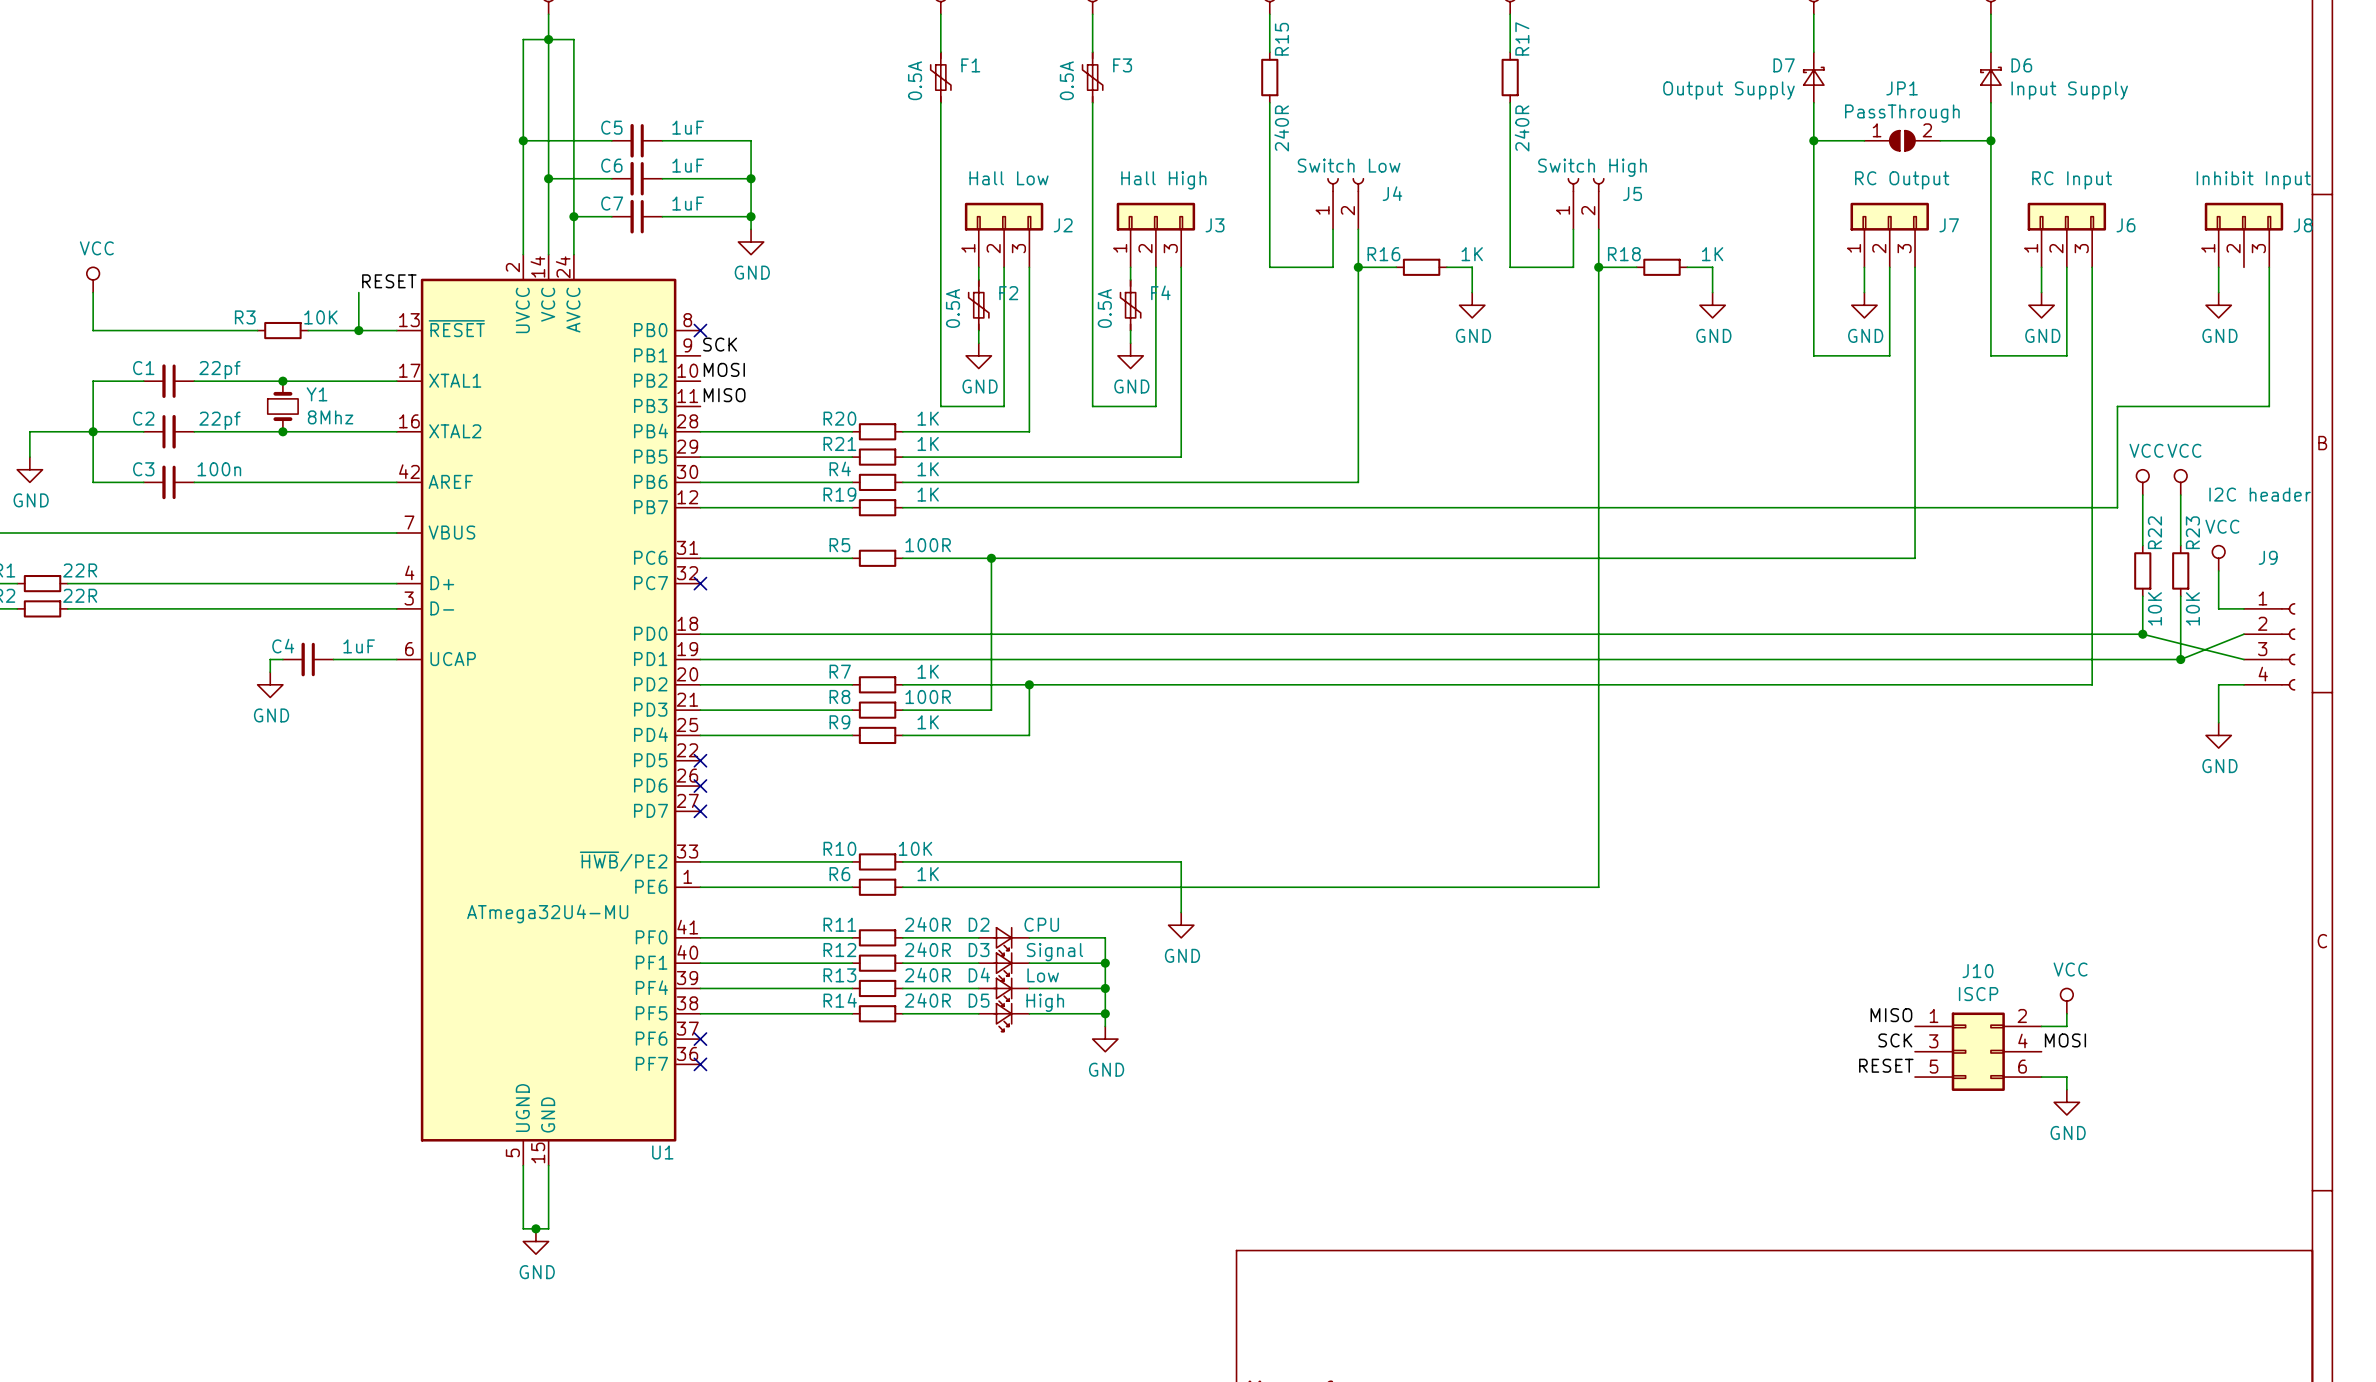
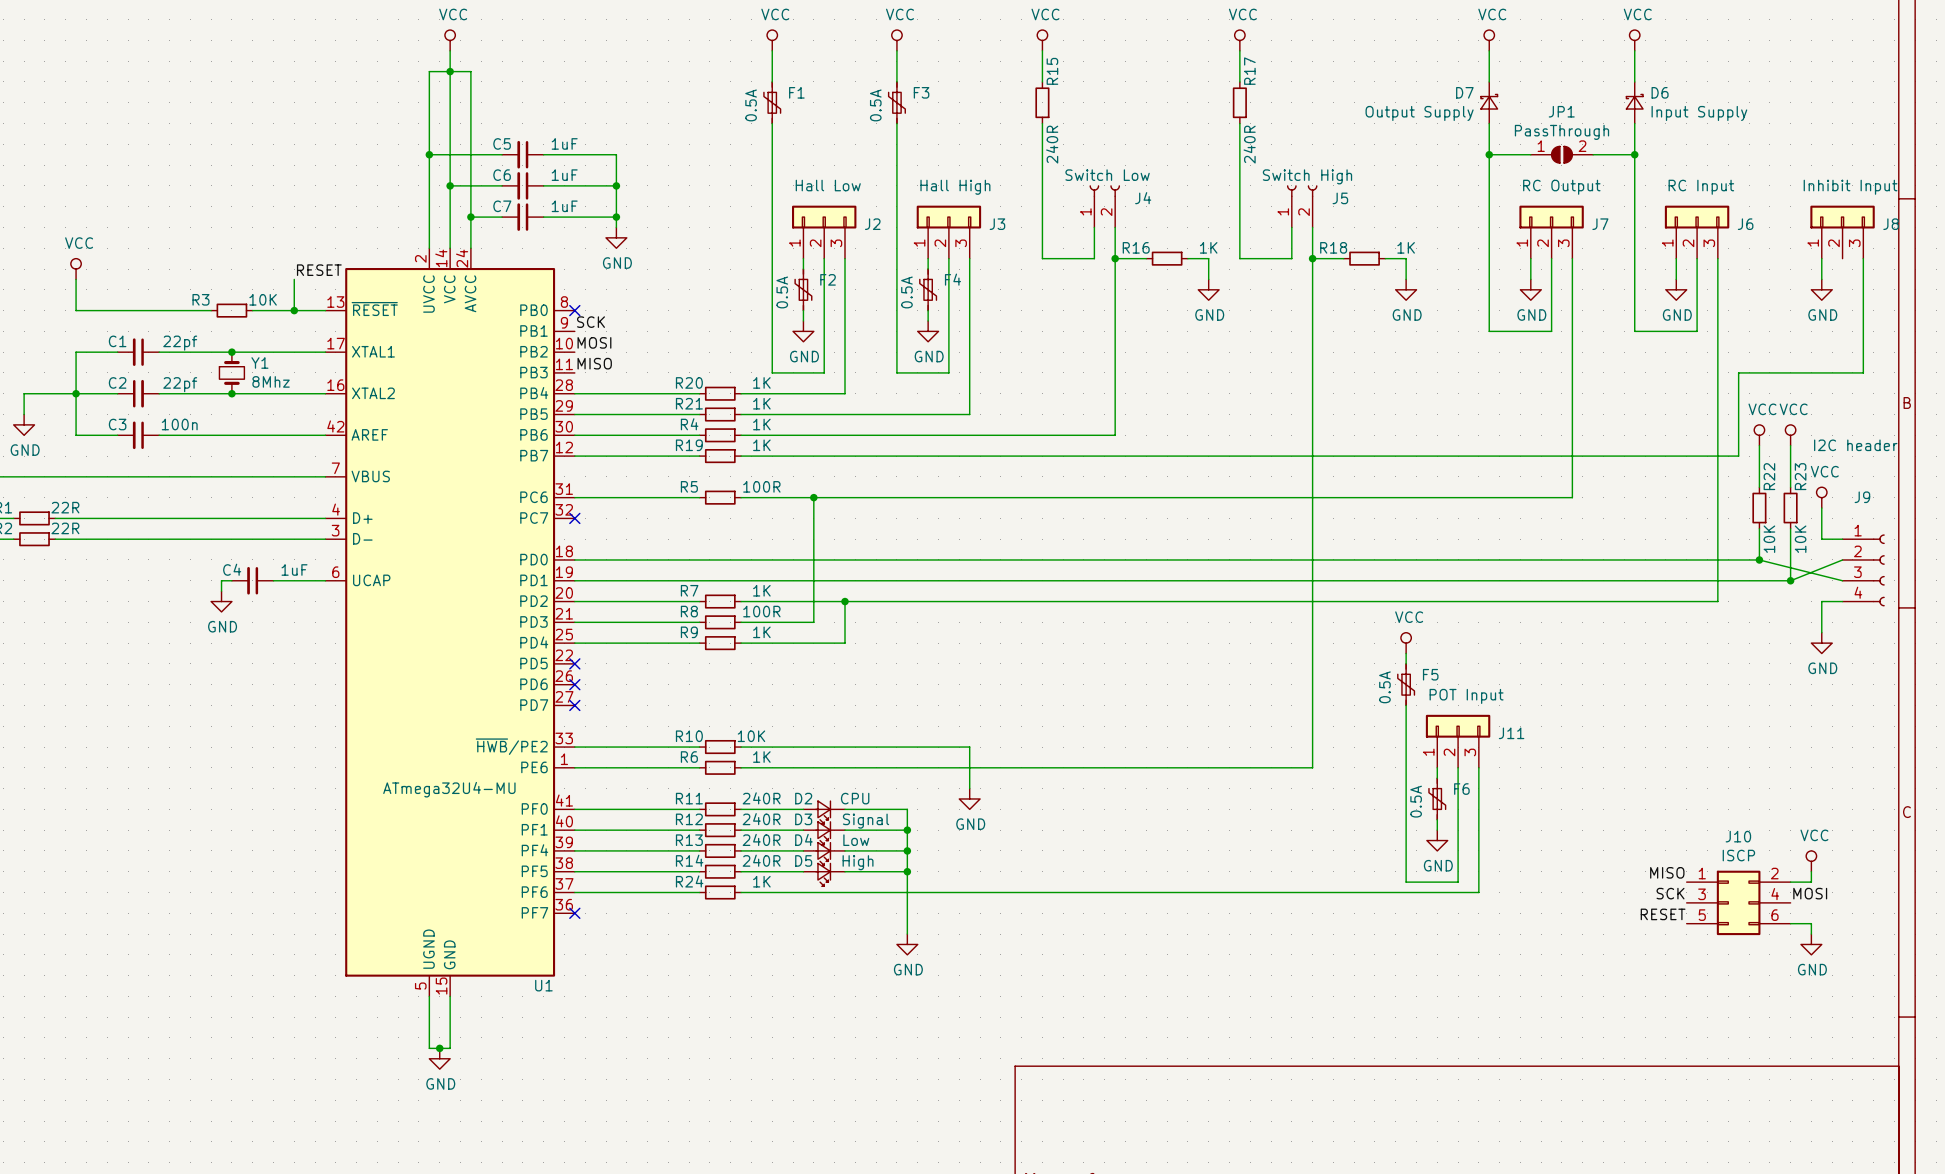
power symbol: none -> VCC (1406, 643)
wire: none -> (1406, 653) (1406, 663)
F5: none -> 0.5A (1406, 684)
wire: none -> (1406, 705) (1406, 882) (1458, 882) (1458, 767)
J11: none -> POT Input (1458, 741)
wire: none -> (1437, 767) (1437, 778)
wire: none -> (1478, 767) (1478, 892) (741, 892)
F6: none -> 0.5A (1437, 798)
wire: none -> (1437, 819) (1437, 830)
power symbol: none -> GND (1437, 840)
power symbol position: VCC (2066, 1001) -> VCC (1811, 861)
wire: (2066, 1013) (2066, 1026) (2041, 1026) -> (1811, 871) (1811, 882) (1790, 882)
label position: MISO (1891, 1015) -> MISO (1667, 872)
wire: none -> (907, 882) (907, 934)
wire: none -> (574, 892) (699, 892)
no-connect mark: (700, 1039) -> none
R24: none -> 1K (720, 892)
power symbol position: GND (1105, 1039) -> GND (907, 944)
label position: SCK (1895, 1040) -> SCK (1670, 893)
label position: MOSI (2065, 1040) -> MOSI (1810, 893)
J10 position: (1978, 1051) -> (1738, 902)
label position: RESET (1886, 1065) -> RESET (1663, 914)
wire: (2041, 1077) (2066, 1077) (2066, 1089) -> (1790, 923) (1811, 923) (1811, 934)
power symbol position: GND (2066, 1102) -> GND (1811, 944)

